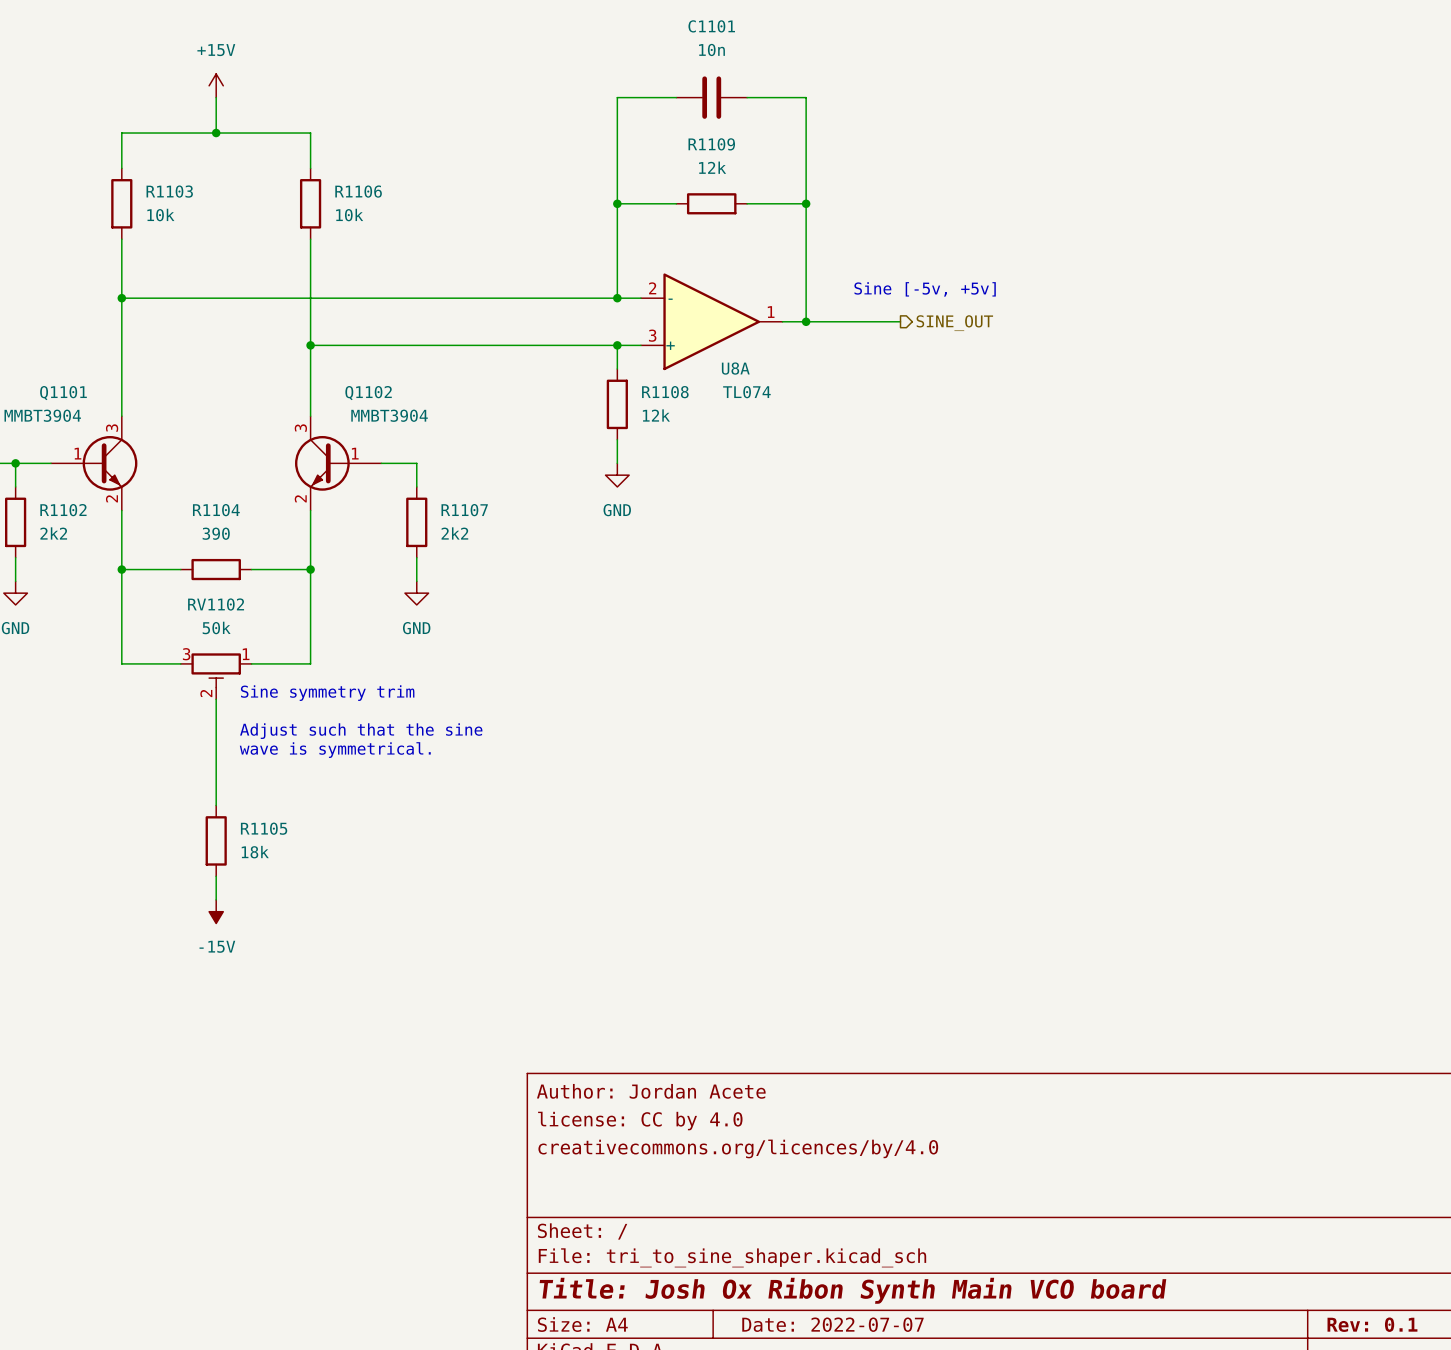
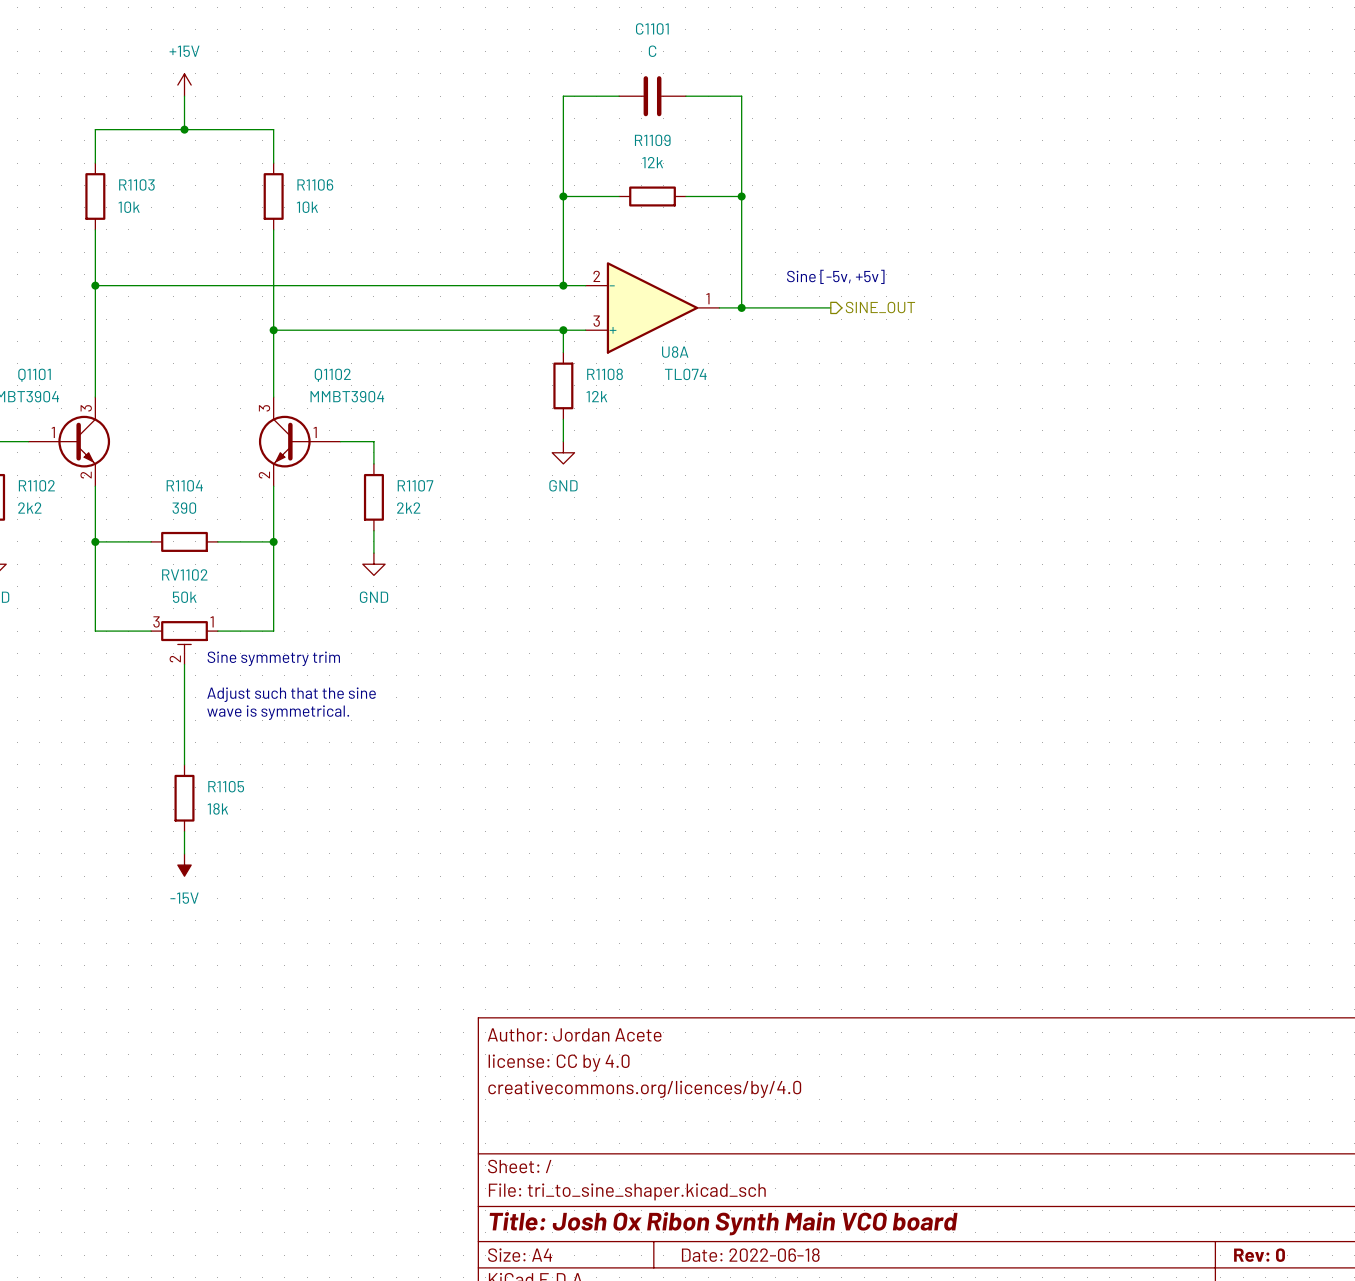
C1101 value: 10n (711, 49) -> C (652, 51)
title block: Date: 2022-07-07 (832, 1324) -> Date: 2022-06-18 (750, 1255)
title block: Rev: 0.1 (1372, 1324) -> Rev: 0 (1259, 1255)

